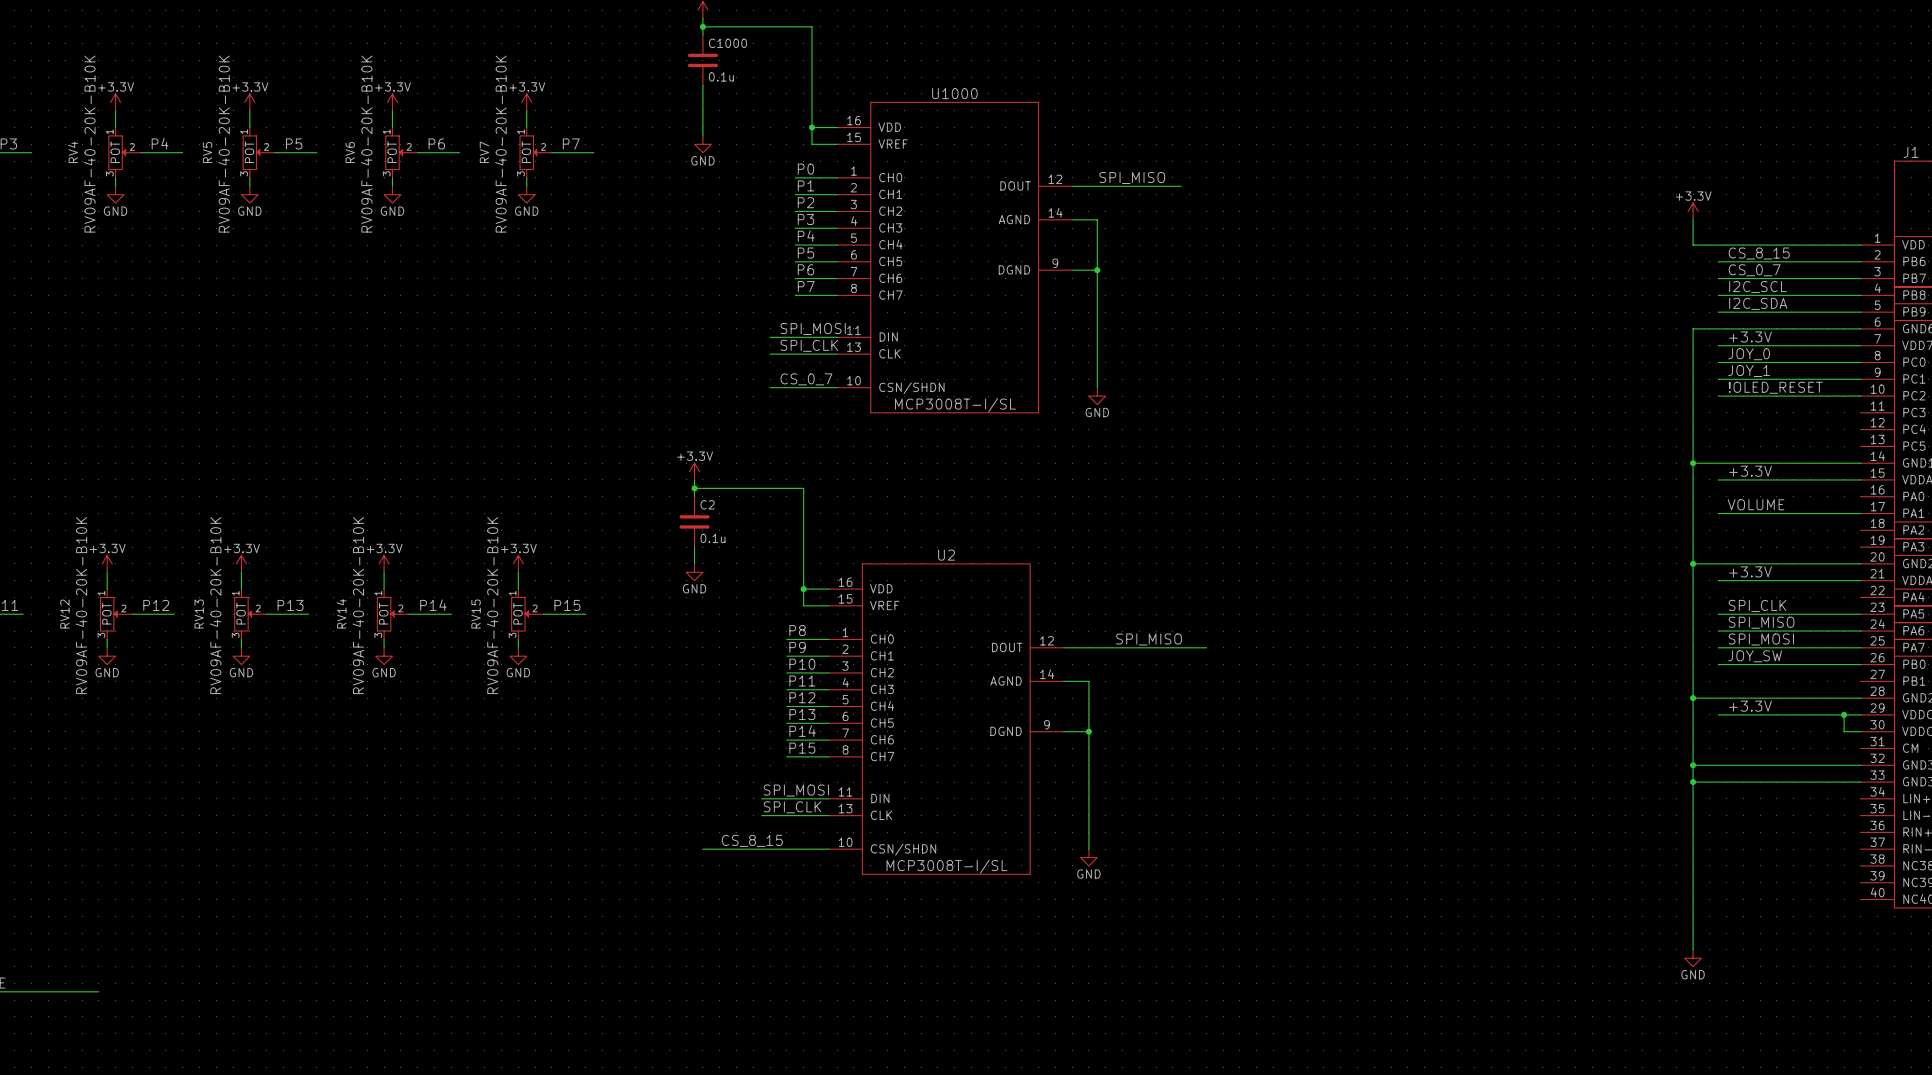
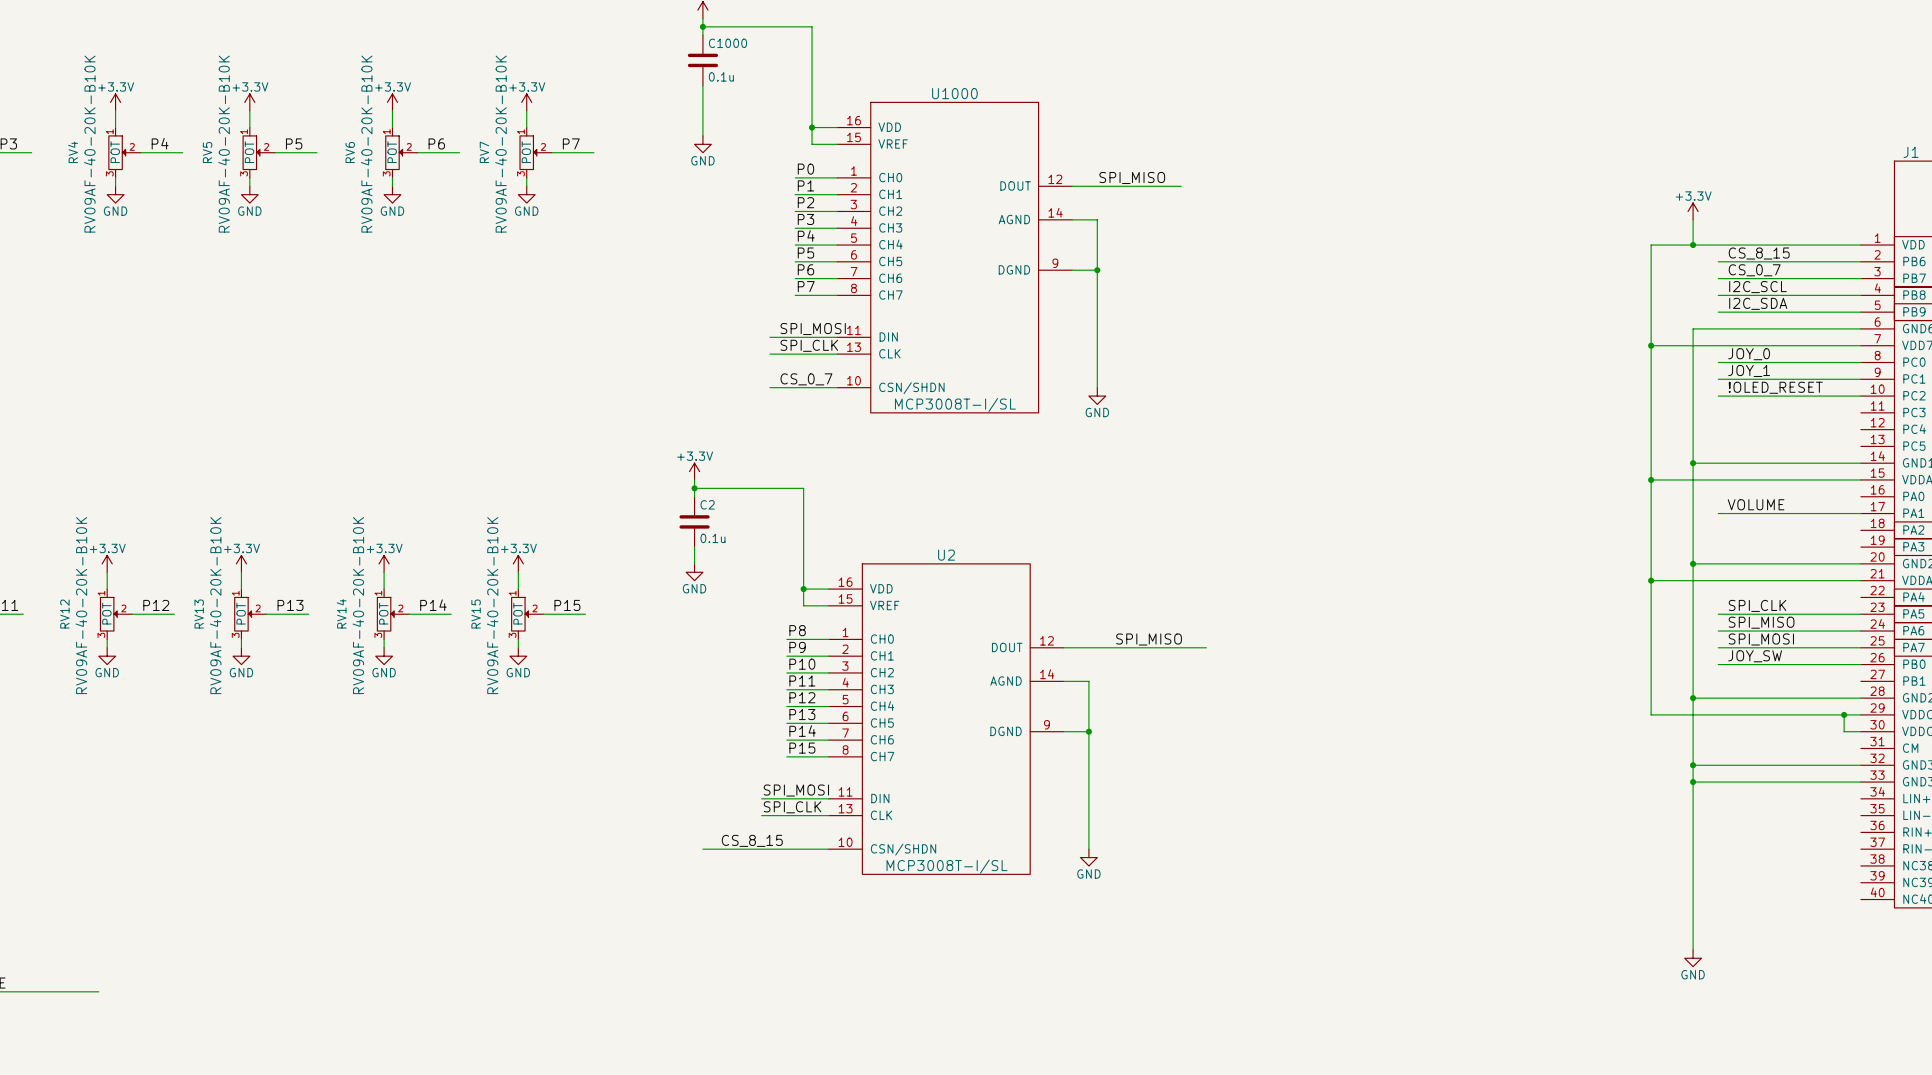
wire: none -> (1693, 245) (1651, 245) (1651, 714) (1718, 714)
junction: none -> (1693, 245)
label: +3.3V (1750, 336) -> none
wire: none -> (1651, 345) (1718, 345)
junction: none -> (1651, 345)
label: +3.3V (1750, 471) -> none
wire: none -> (1651, 479) (1718, 479)
junction: none -> (1651, 479)
label: +3.3V (1750, 571) -> none
wire: none -> (1651, 580) (1718, 580)
junction: none -> (1651, 580)
label: +3.3V (1750, 706) -> none

